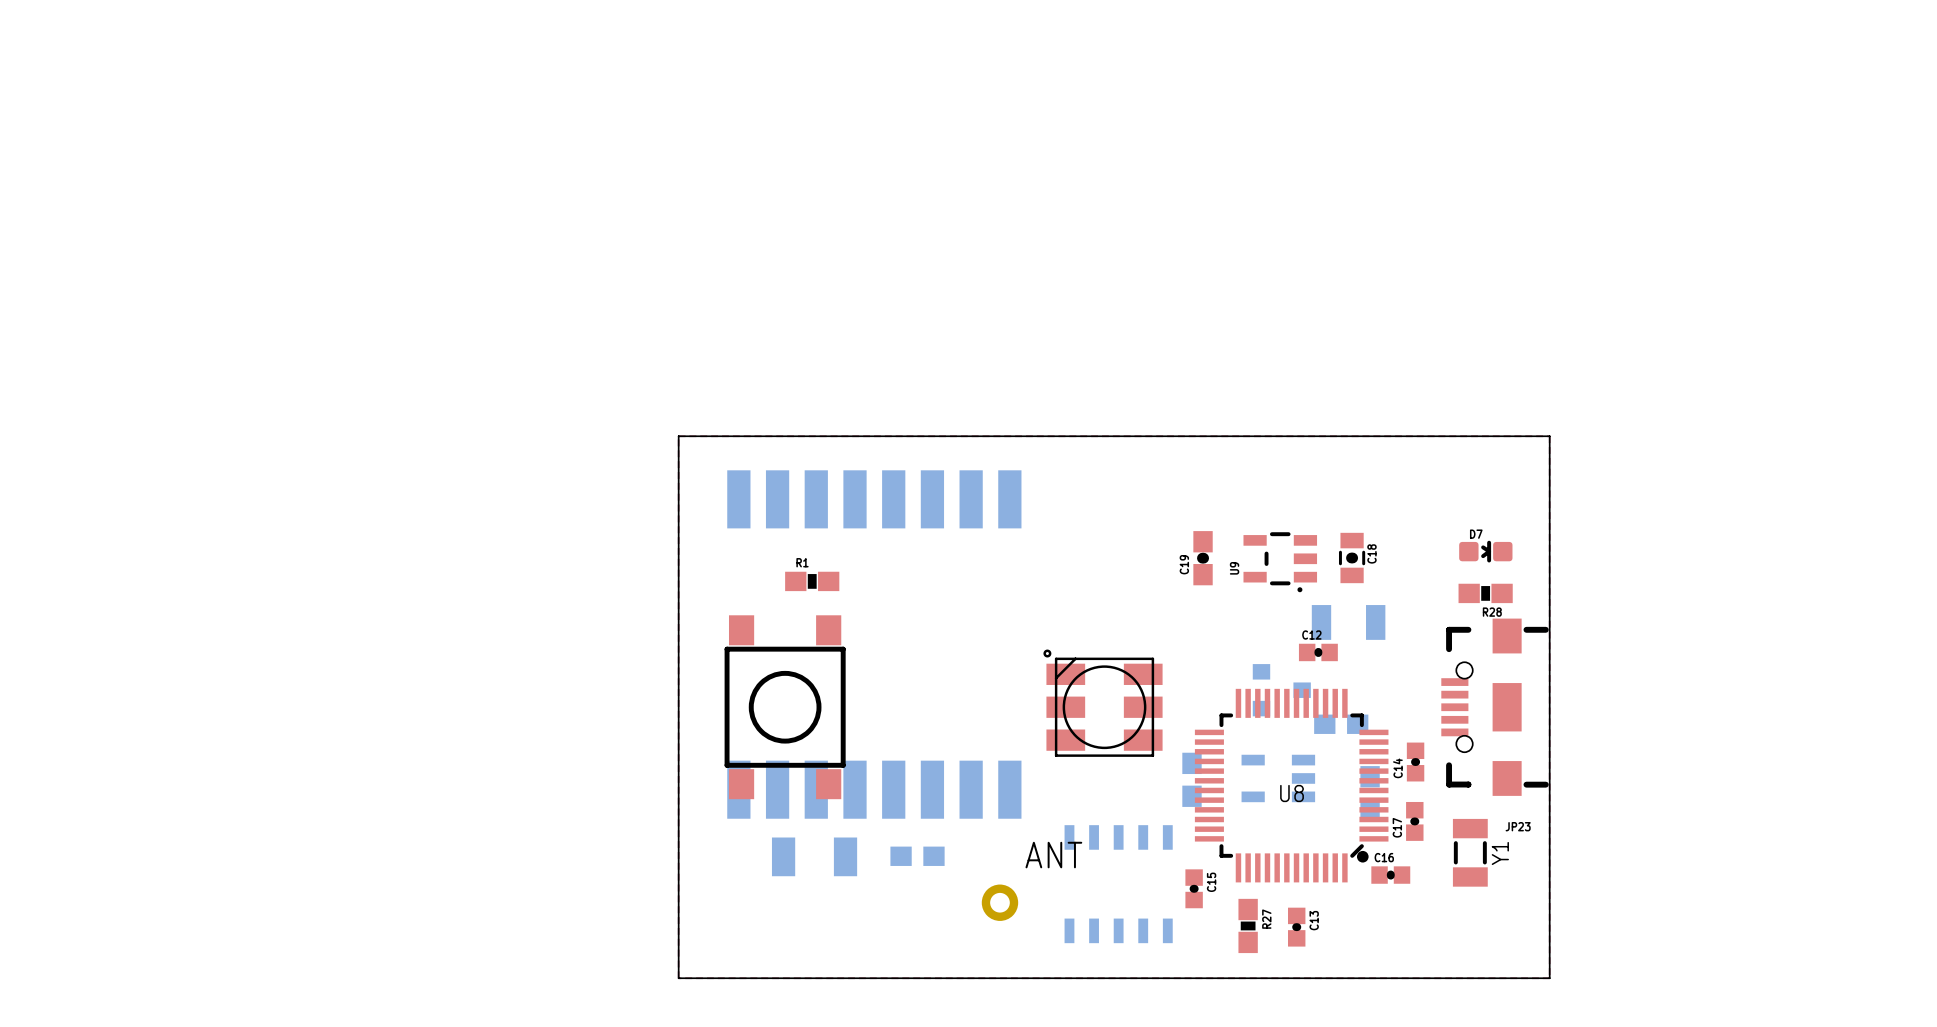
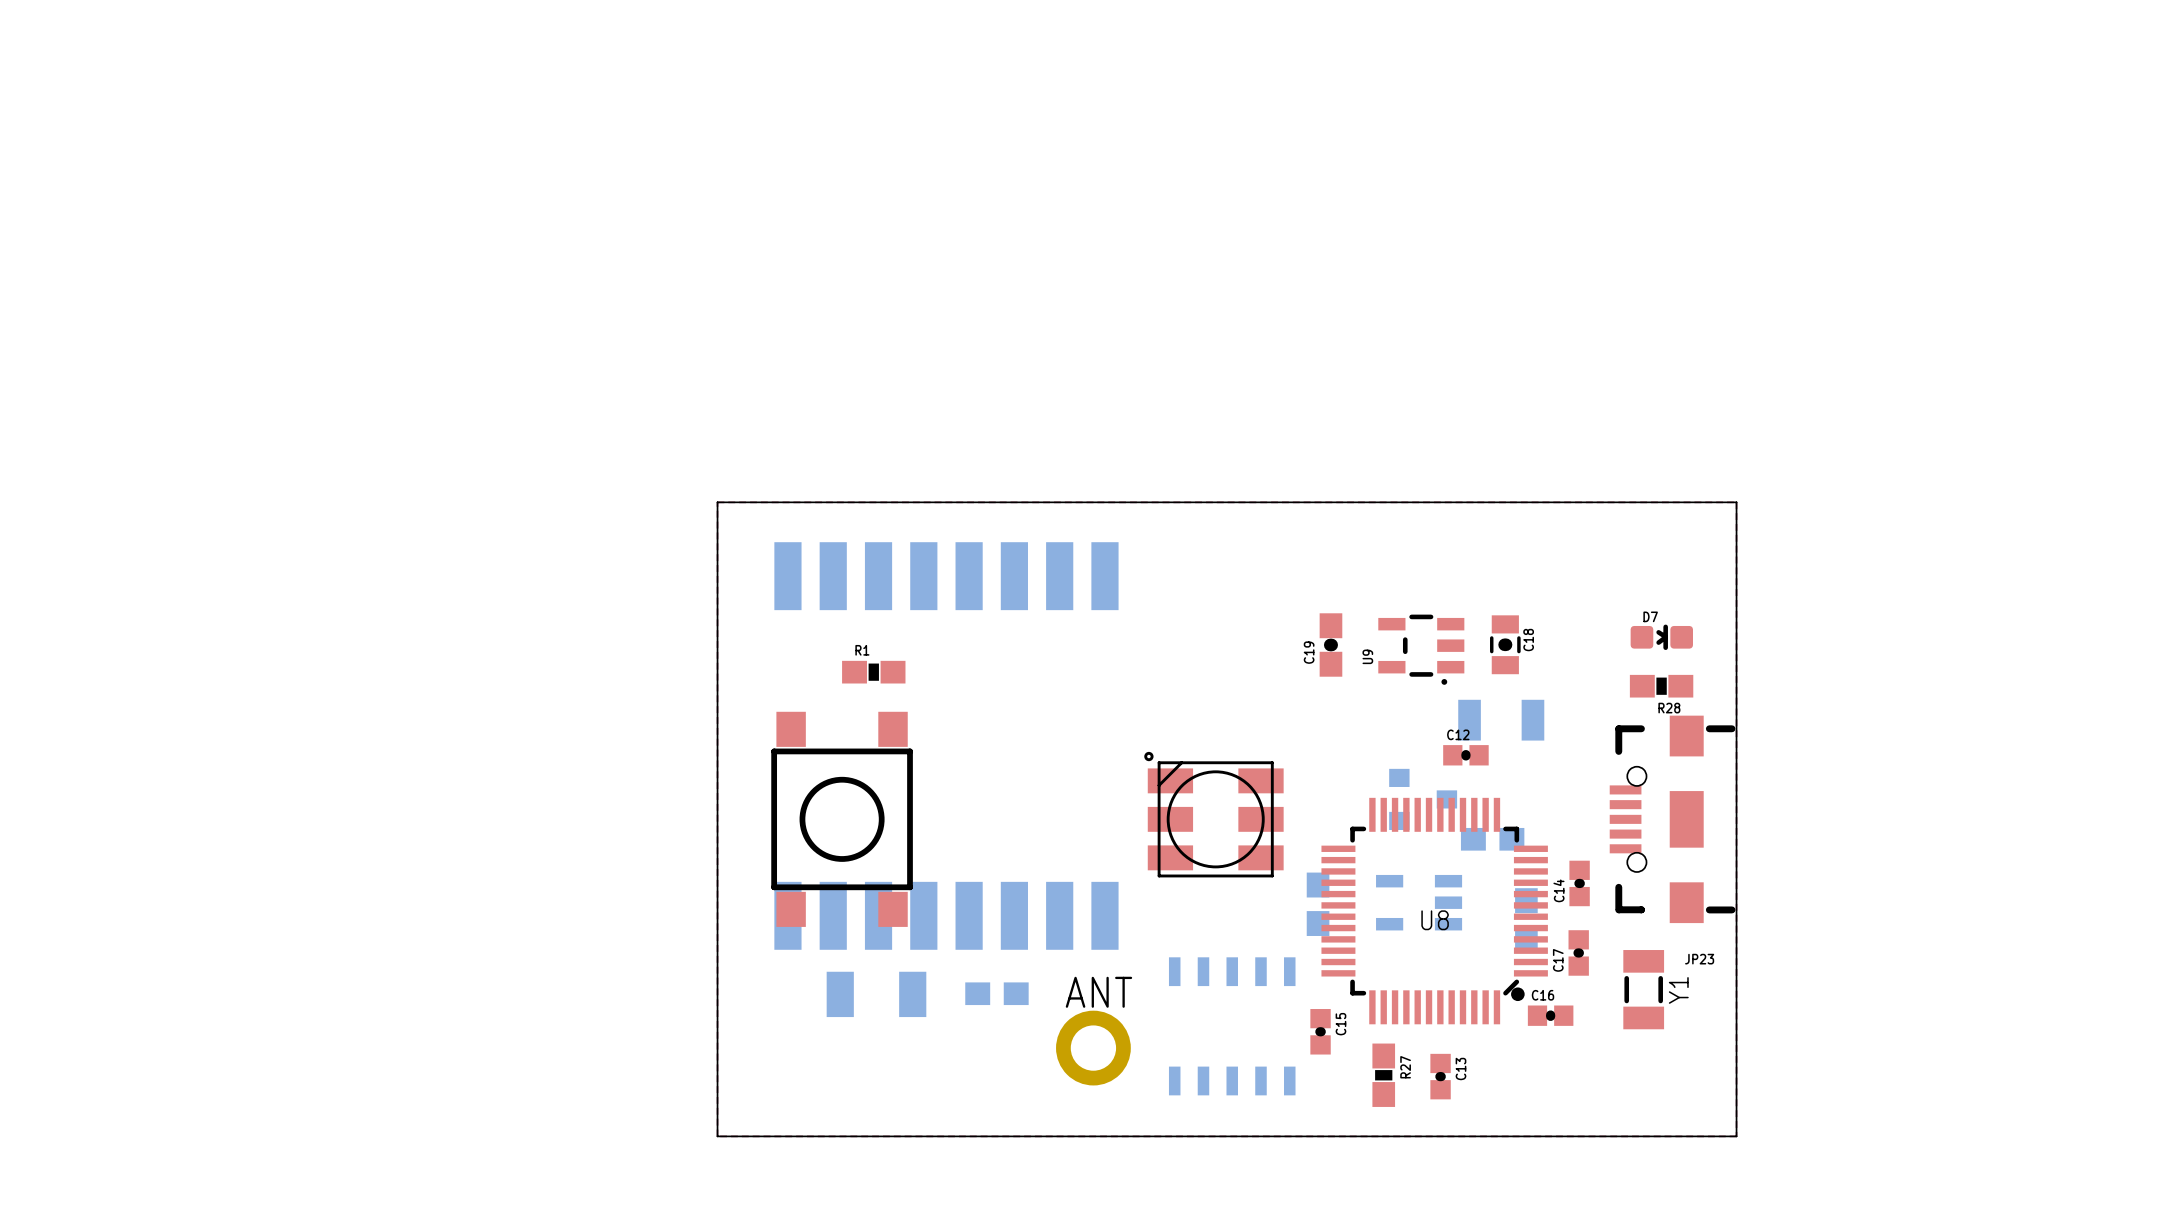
ANT name position: ANT (1053, 855) -> ANT (1098, 992)
ANT footprint: [981, 884, 1019, 921] -> [1056, 1010, 1131, 1086]

